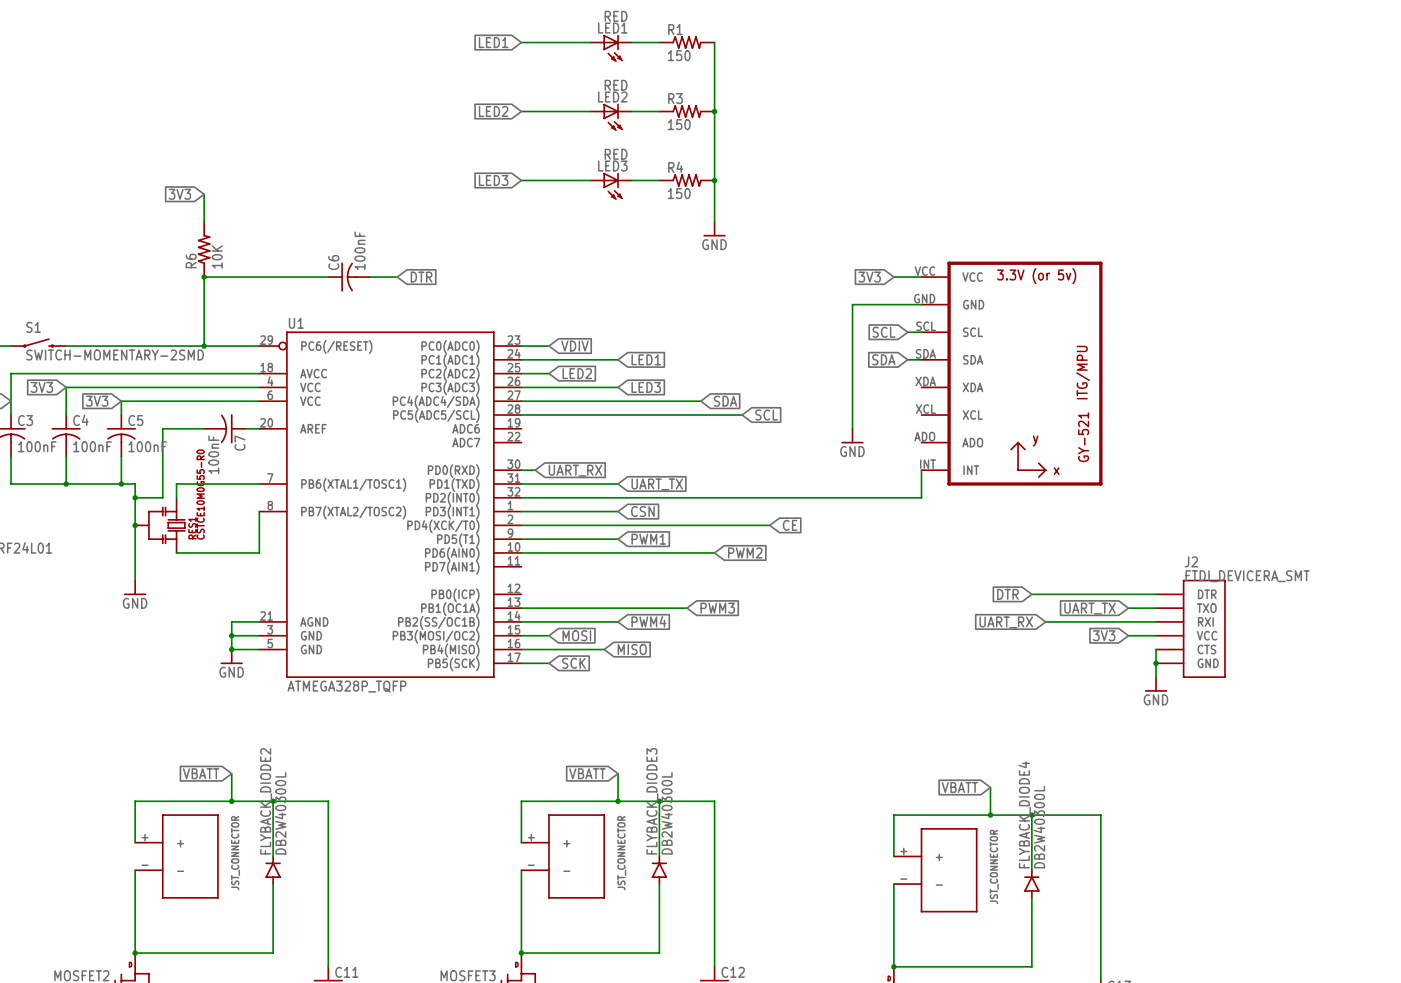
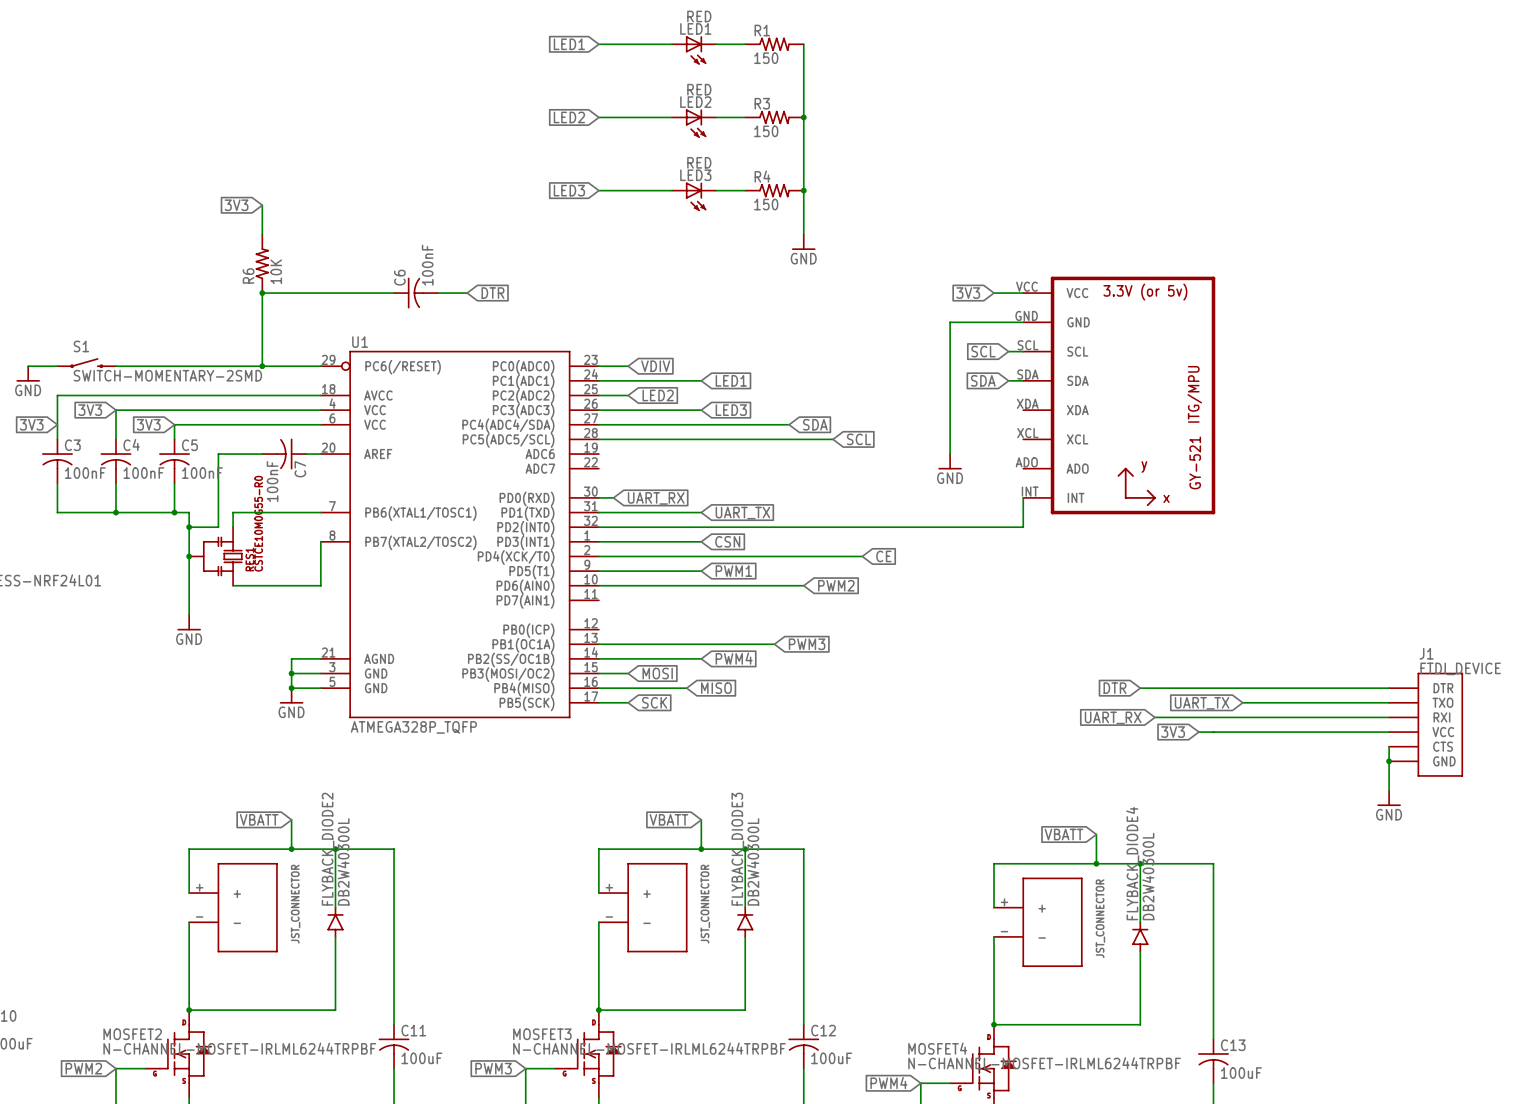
global label position: DTR (1007, 594) -> DTR (1114, 688)
wire: (1031, 594) (1156, 594) -> none
global label position: UART_TX (1090, 608) -> UART_TX (1202, 703)
wire: (1128, 608) (1156, 608) -> none
wire: (1045, 621) (1156, 621) -> none
global label position: UART_RX (1006, 622) -> UART_RX (1113, 717)
J2: FTDI_DEVICERA_SMT (1190, 628) -> none
global label position: 3V3 (1104, 635) -> 3V3 (1173, 732)
wire: (1128, 635) (1156, 635) -> none
wire: none -> (1140, 688) (1389, 688)
wire: (1156, 649) (1156, 677) -> none
wire: none -> (1242, 702) (1389, 702)
junction: (1156, 663) -> none
wire: none -> (1154, 717) (1389, 717)
power symbol position: GND (1156, 684) -> GND (1389, 798)
J1: none -> FTDI_DEVICE (1426, 724)
wire: none -> (1198, 732) (1389, 732)
wire: none -> (1389, 746) (1389, 790)
junction: none -> (1389, 761)

